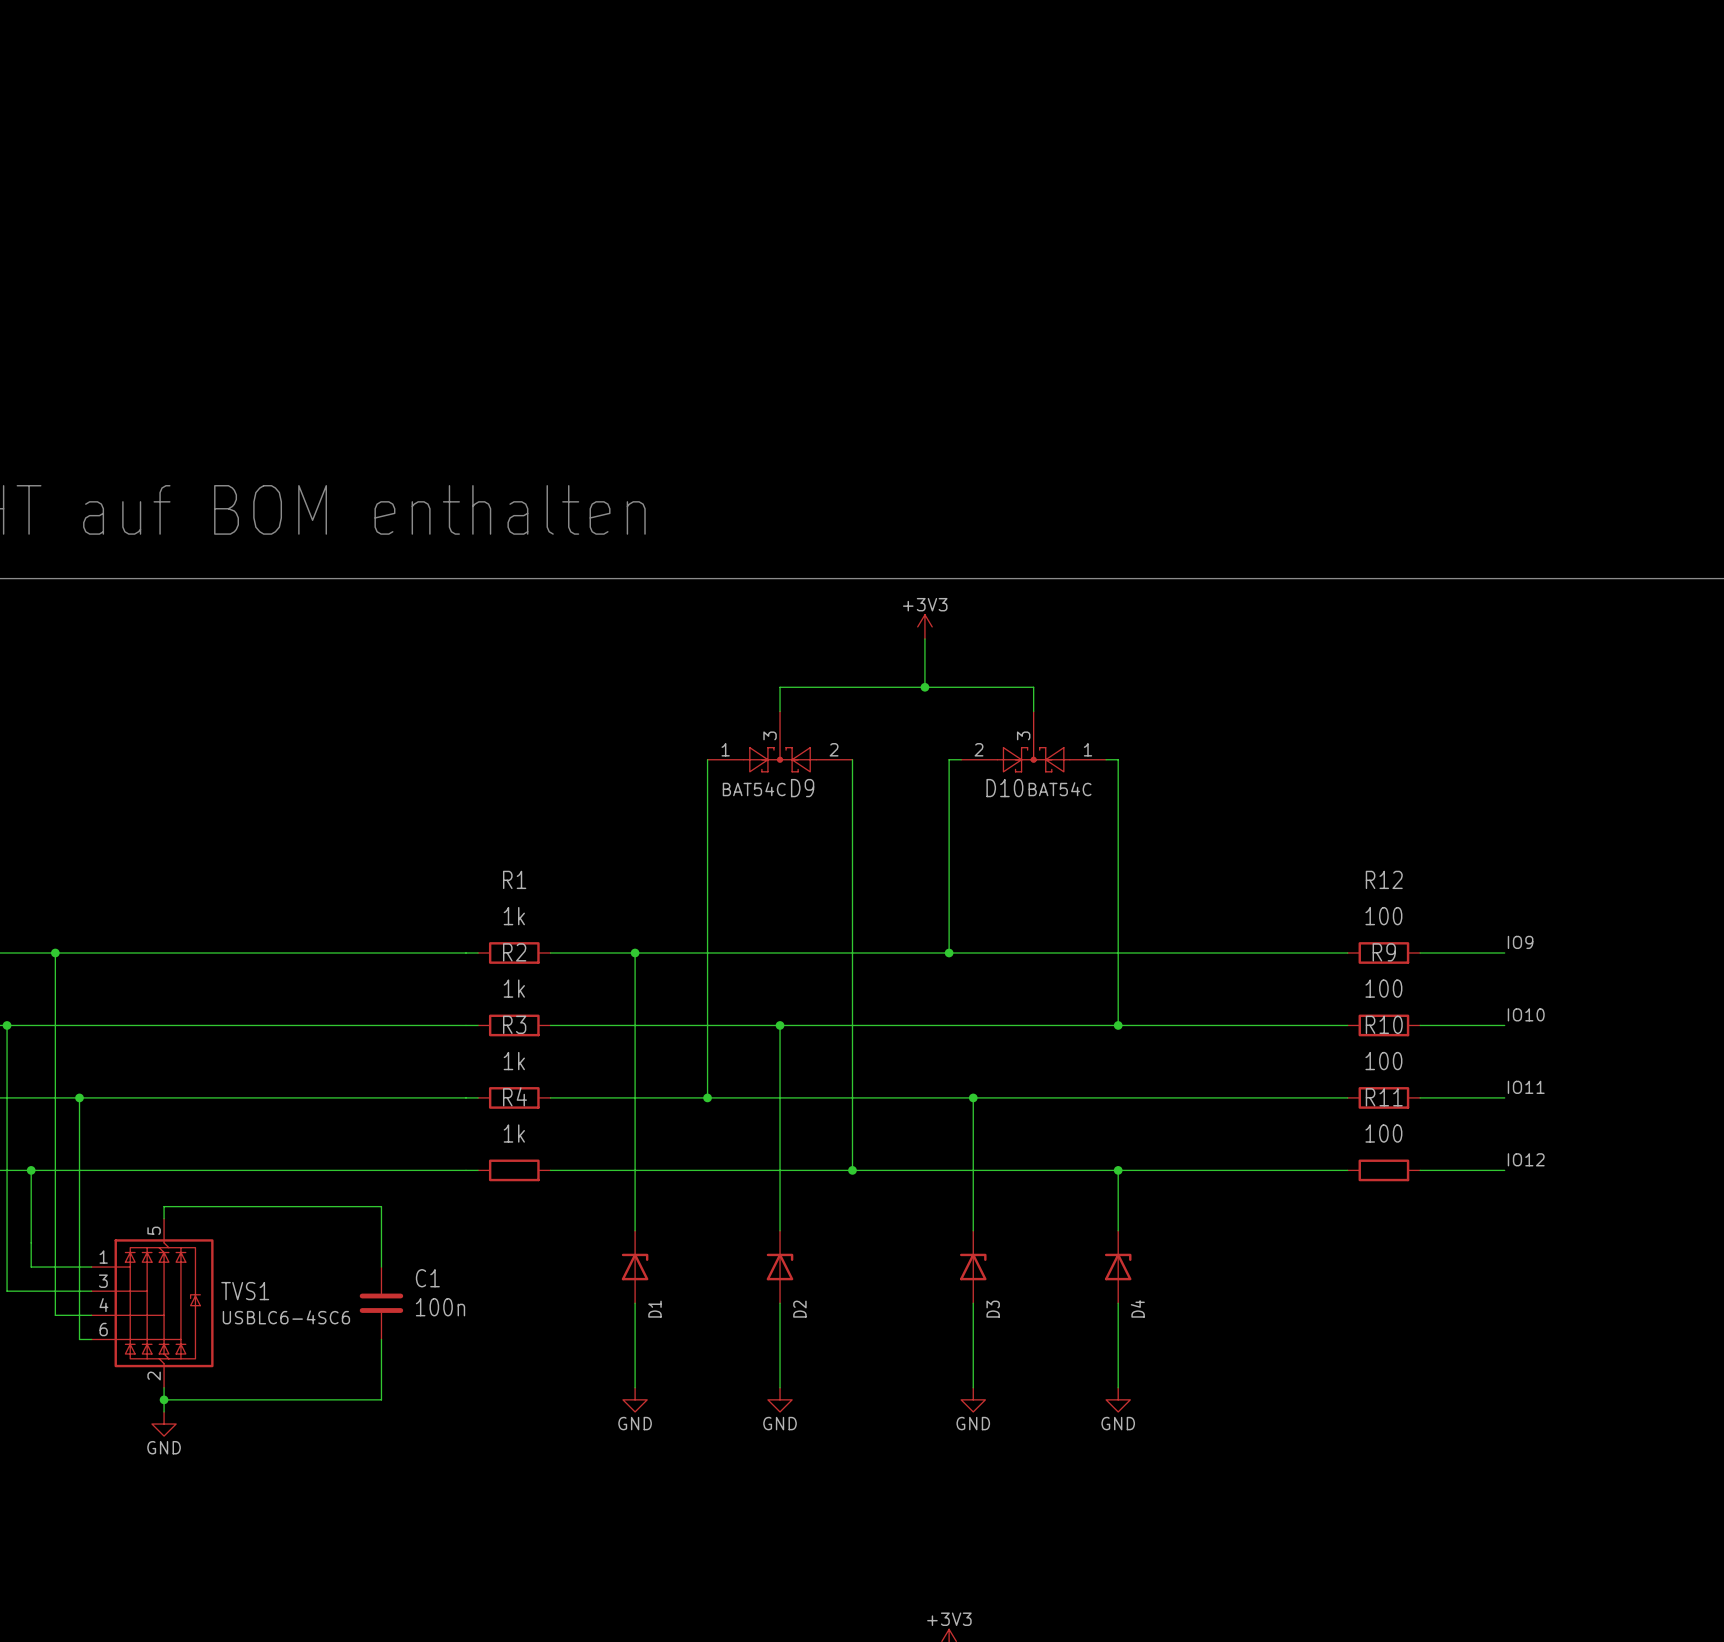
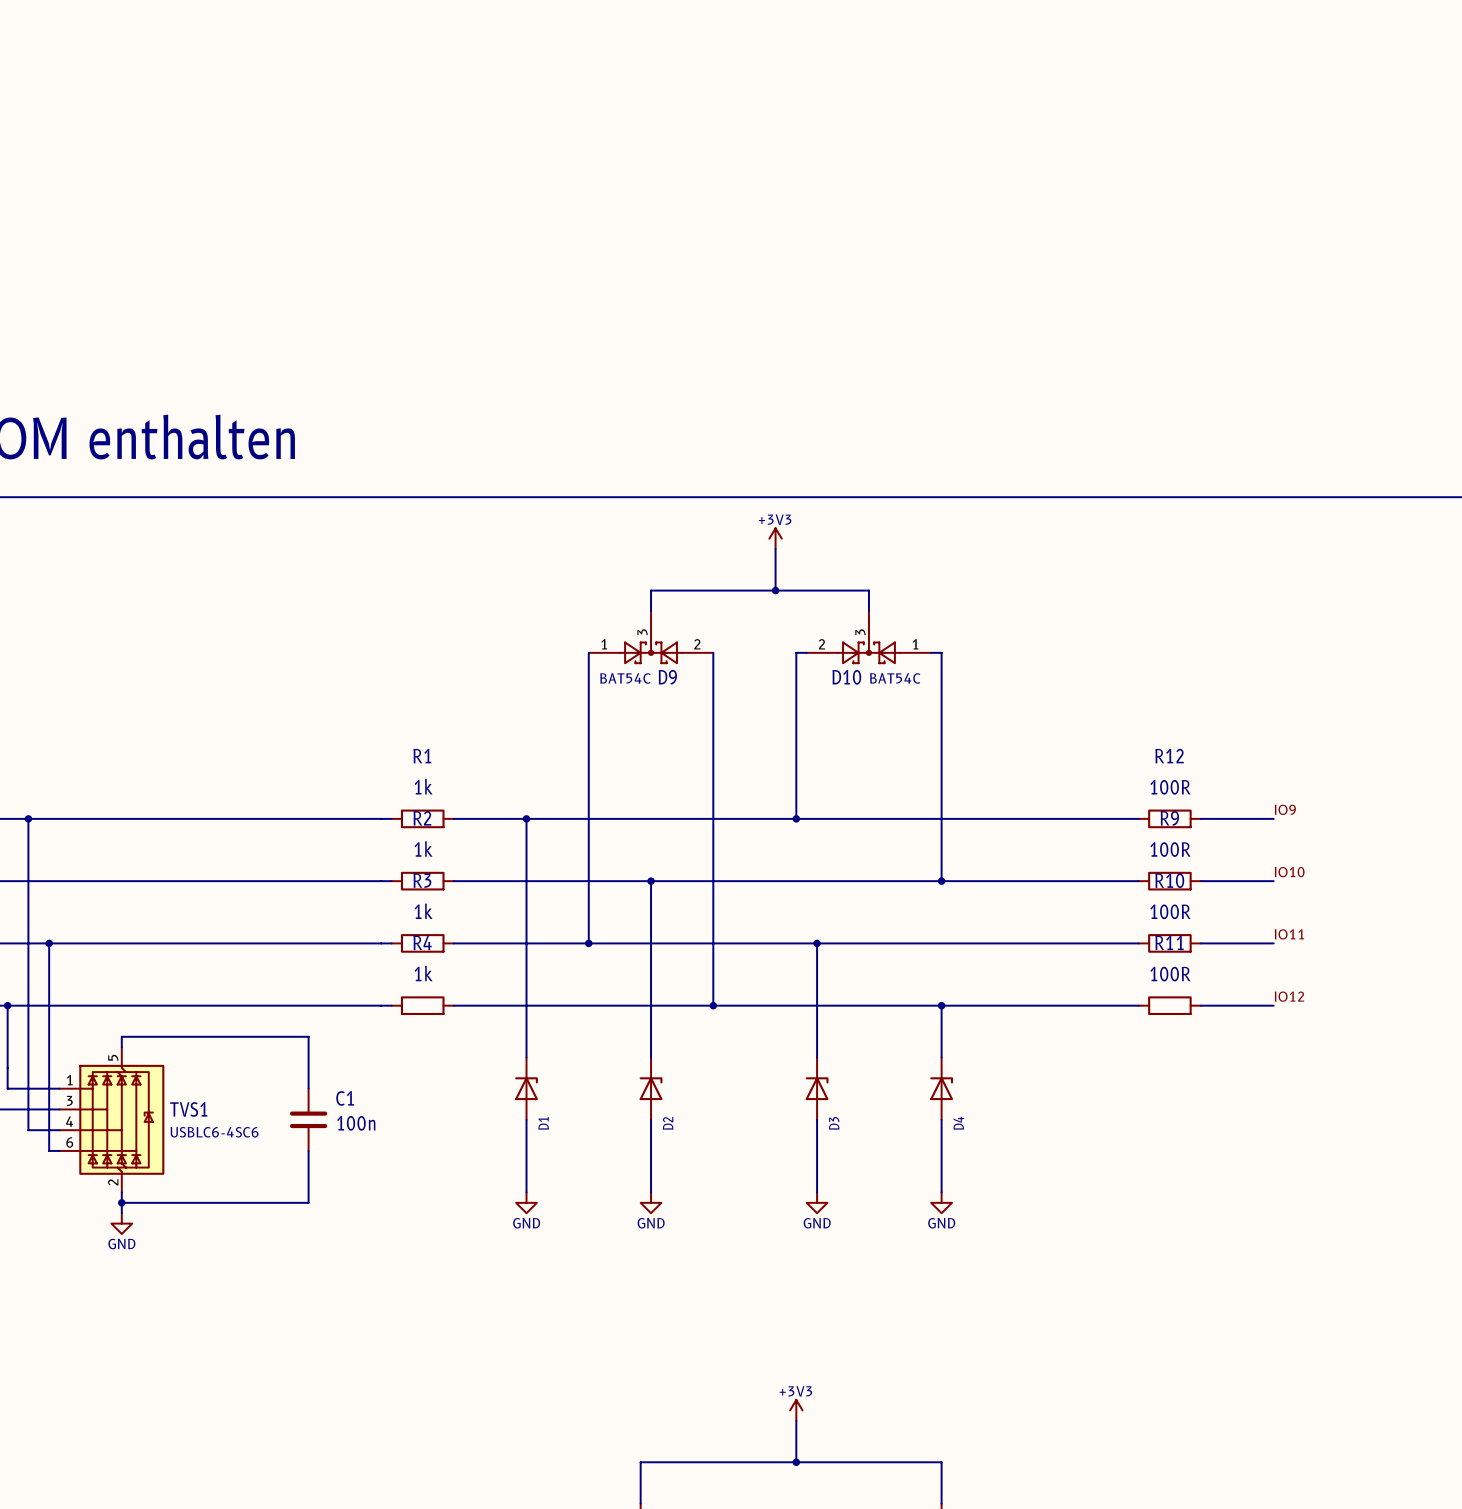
R12 value: 100 (1383, 916) -> 100R (1170, 787)
R9 value: 100 (1383, 988) -> 100R (1170, 849)
R10 value: 100 (1383, 1061) -> 100R (1170, 911)
R11 value: 100 (1383, 1133) -> 100R (1170, 974)

